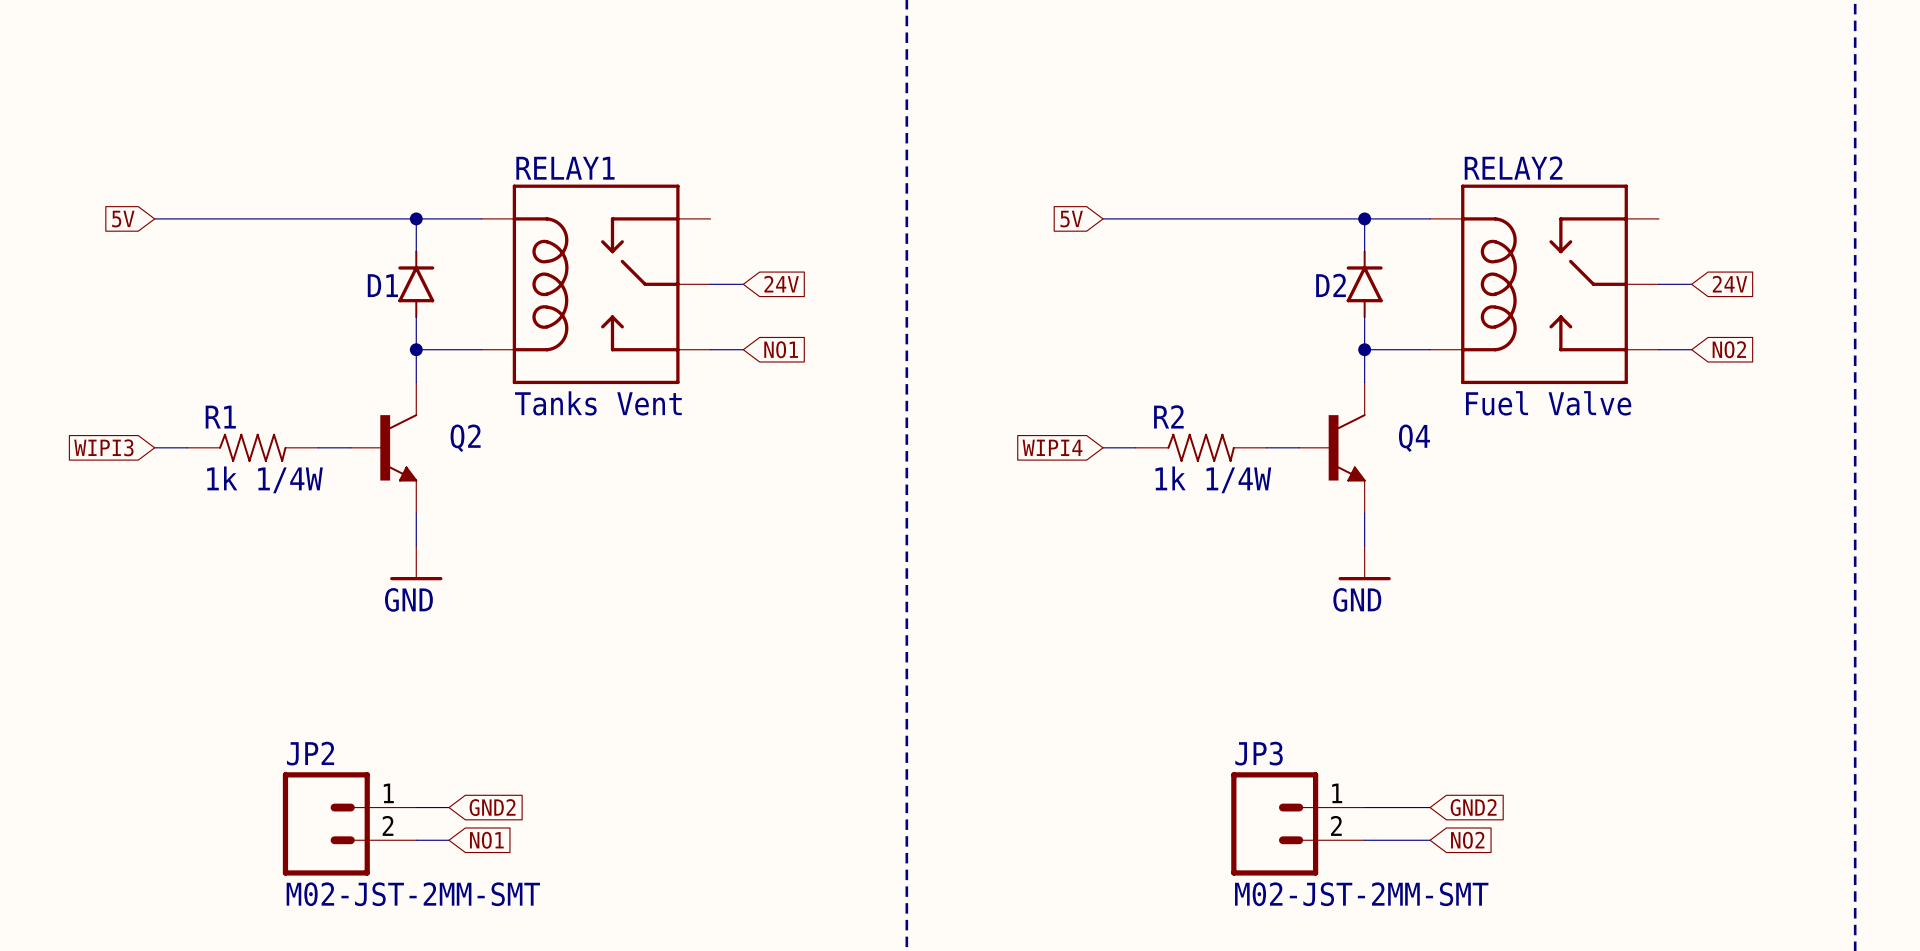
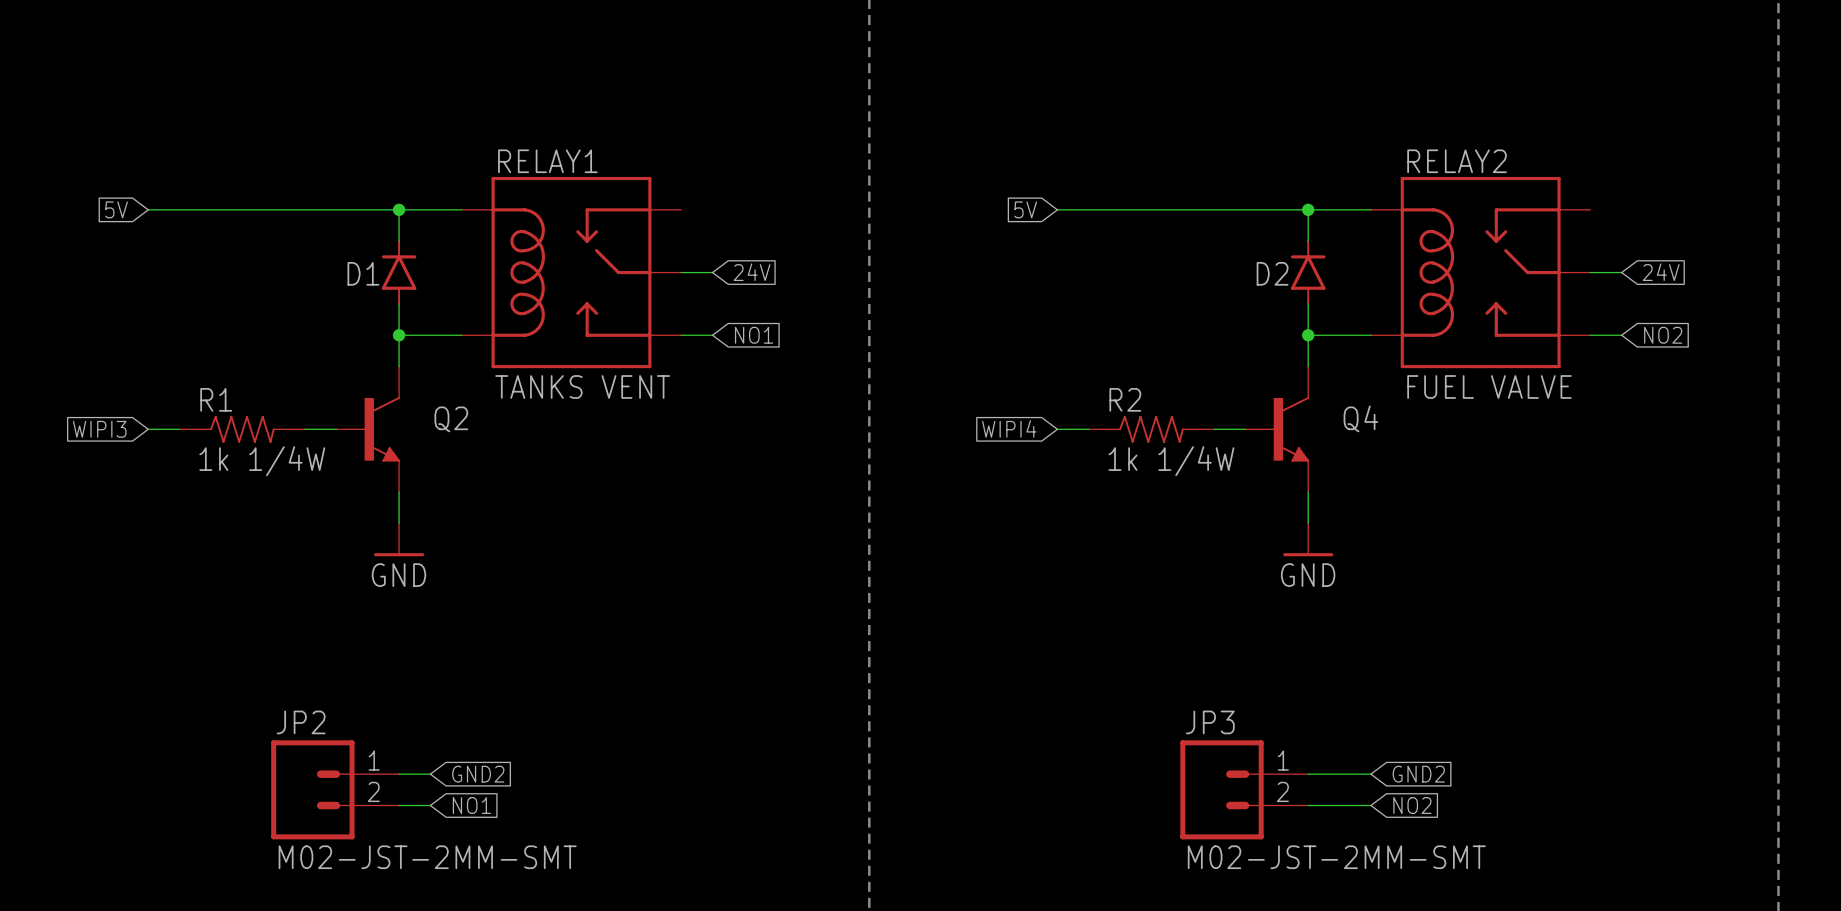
RELAY1 value: Tanks Vent (598, 403) -> TANKS VENT (582, 386)
RELAY2 value: Fuel Valve (1548, 403) -> FUEL VALVE (1489, 386)

